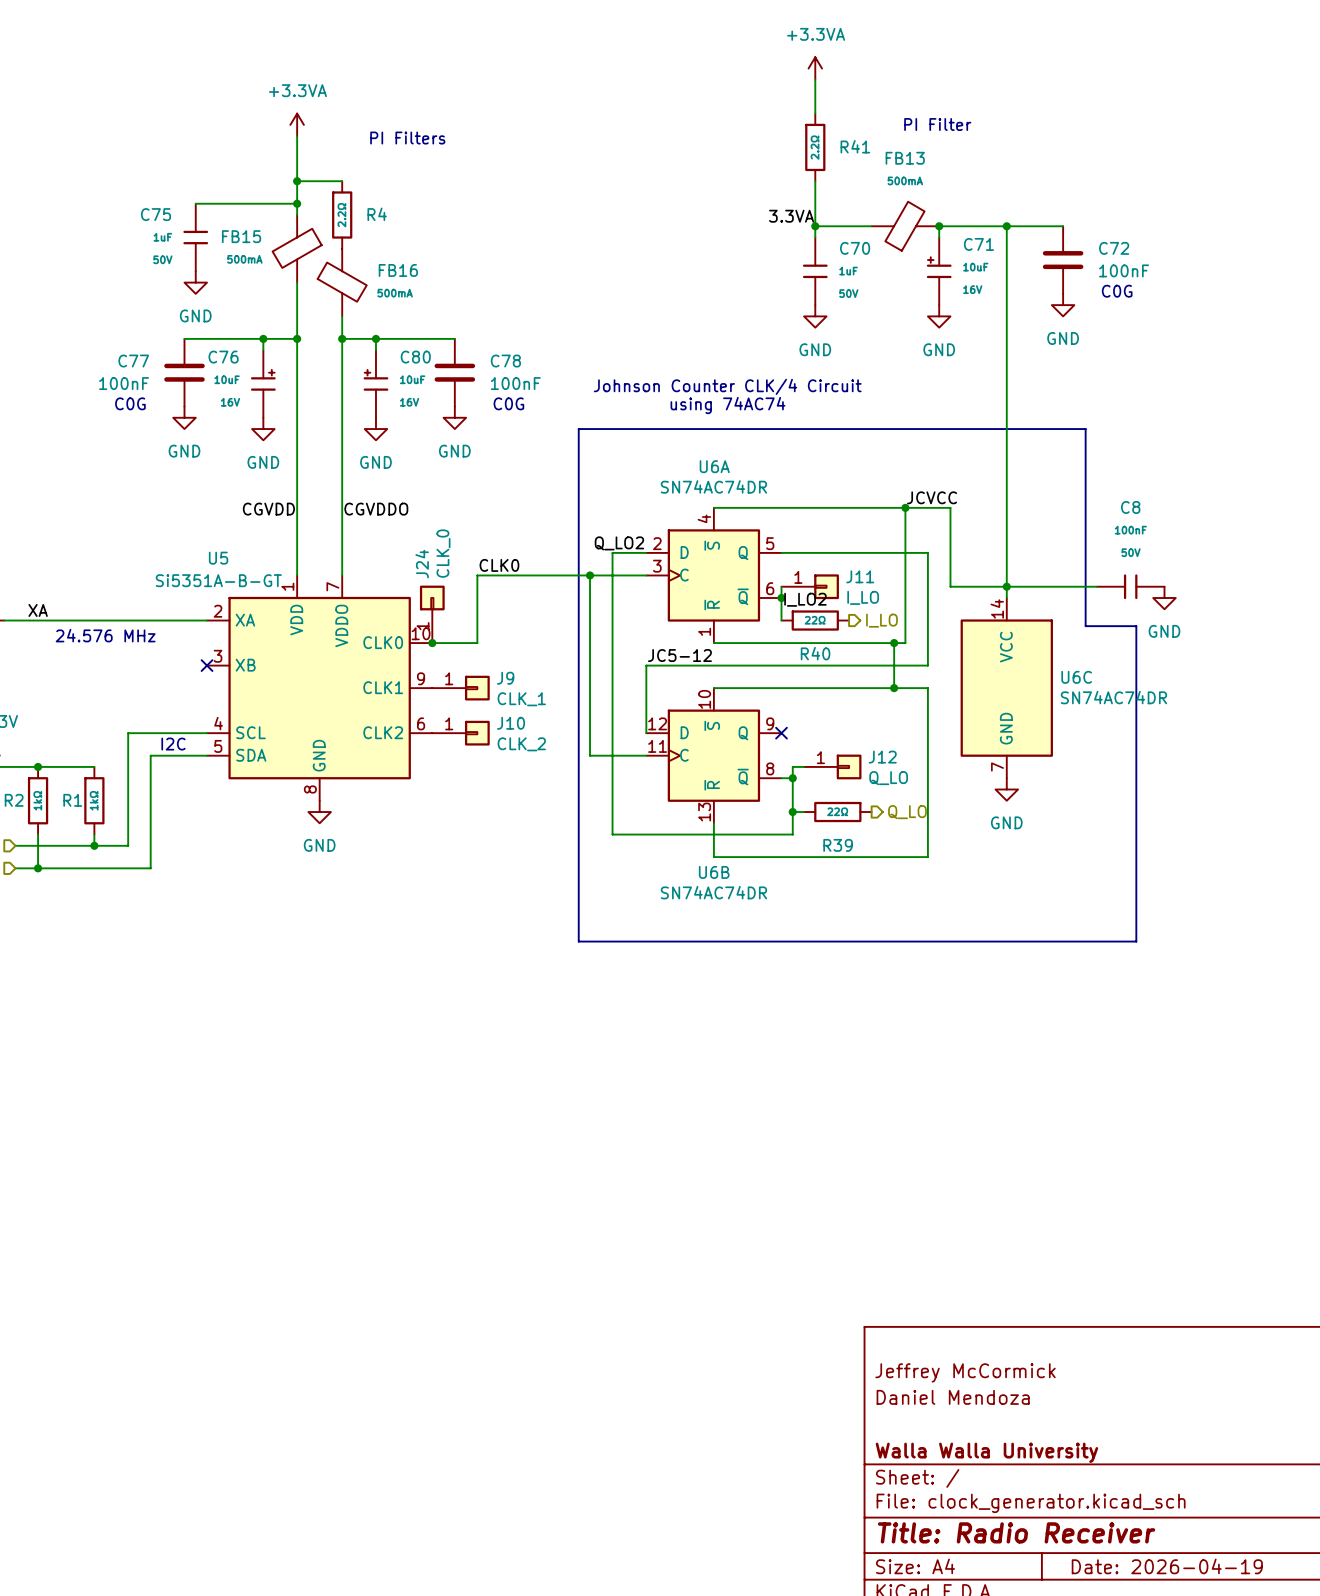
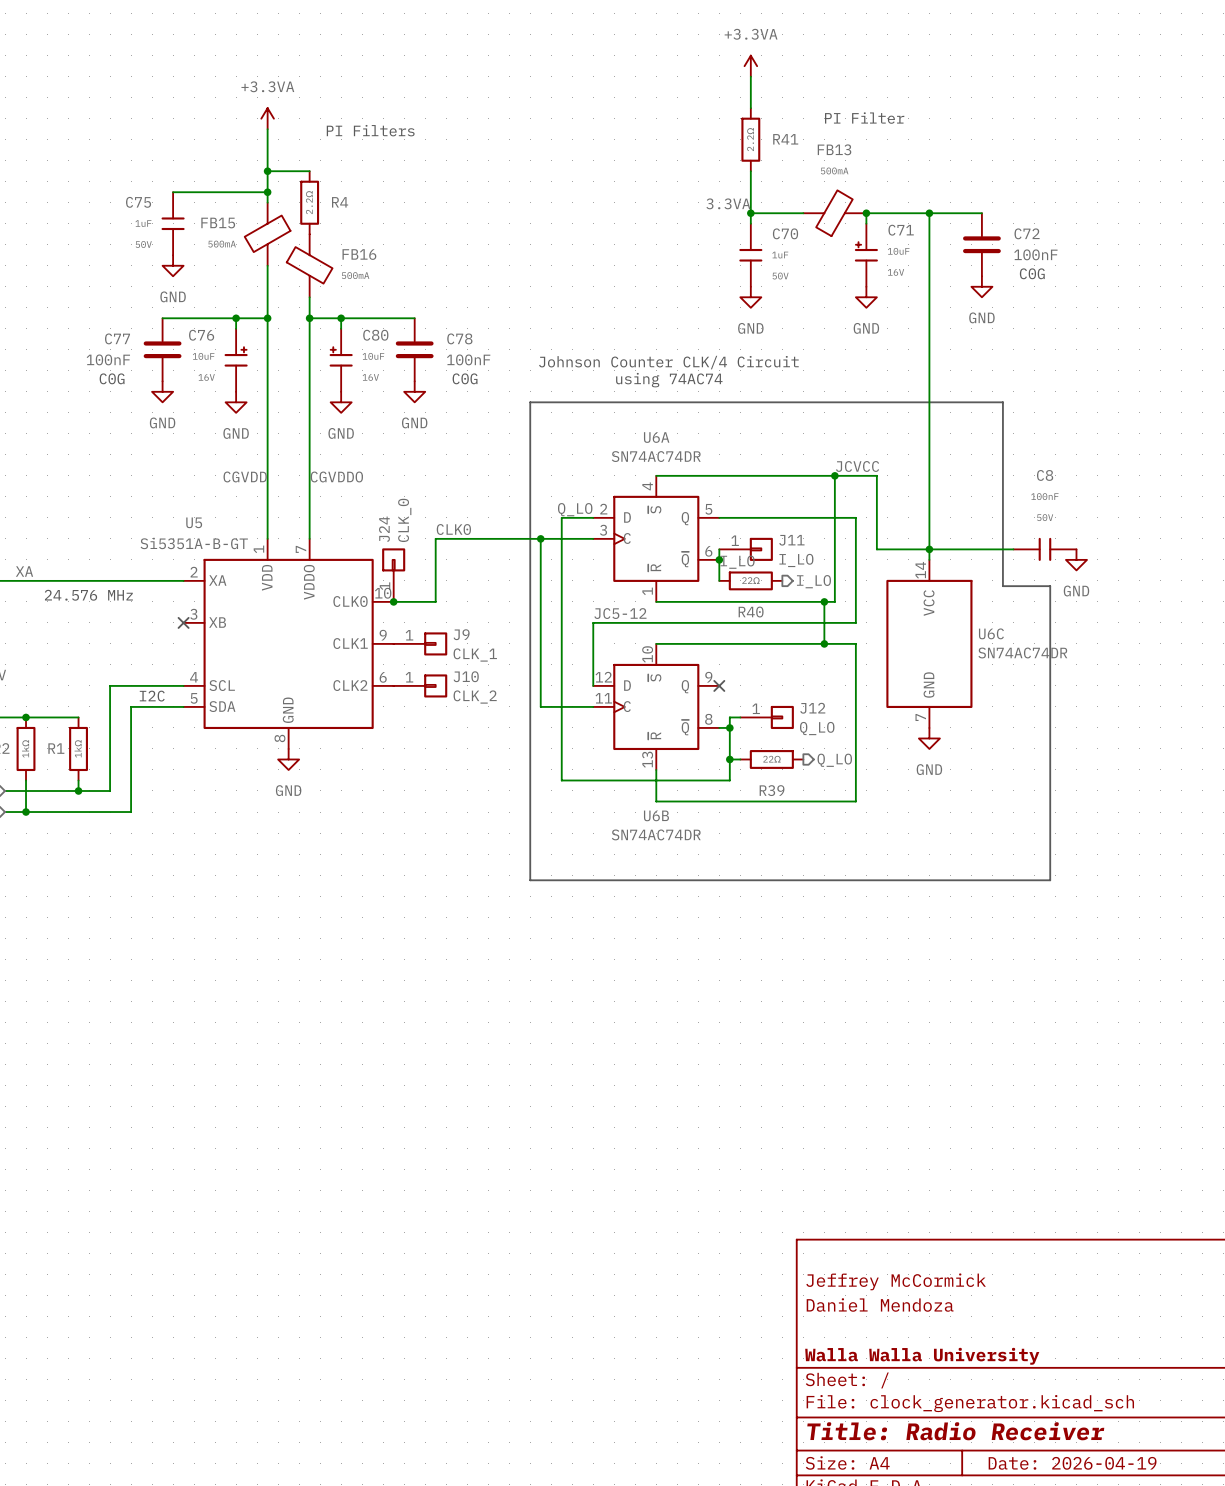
label: Q_LO2 (619, 543) -> Q_LO (575, 509)
label: I_LO2 (805, 599) -> I_LO (737, 562)

